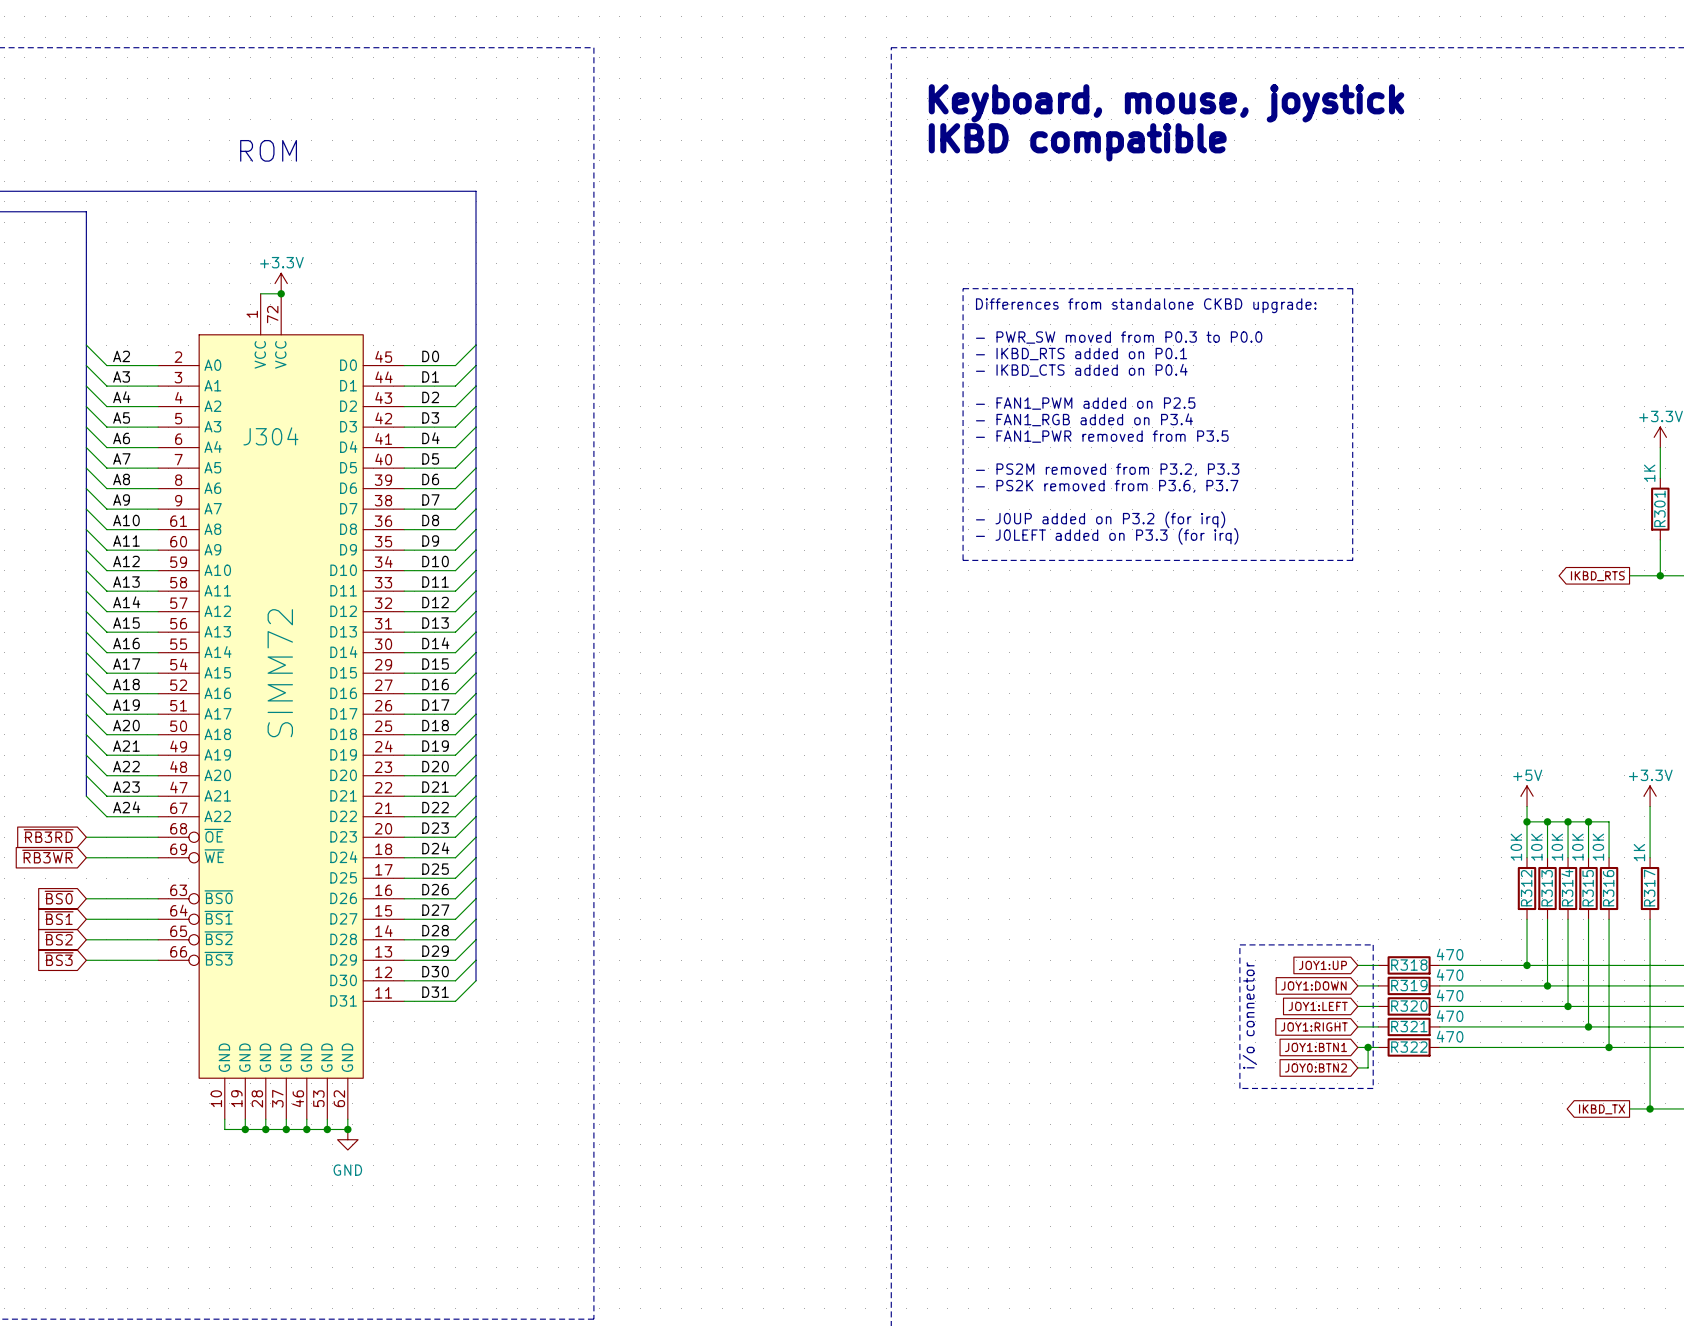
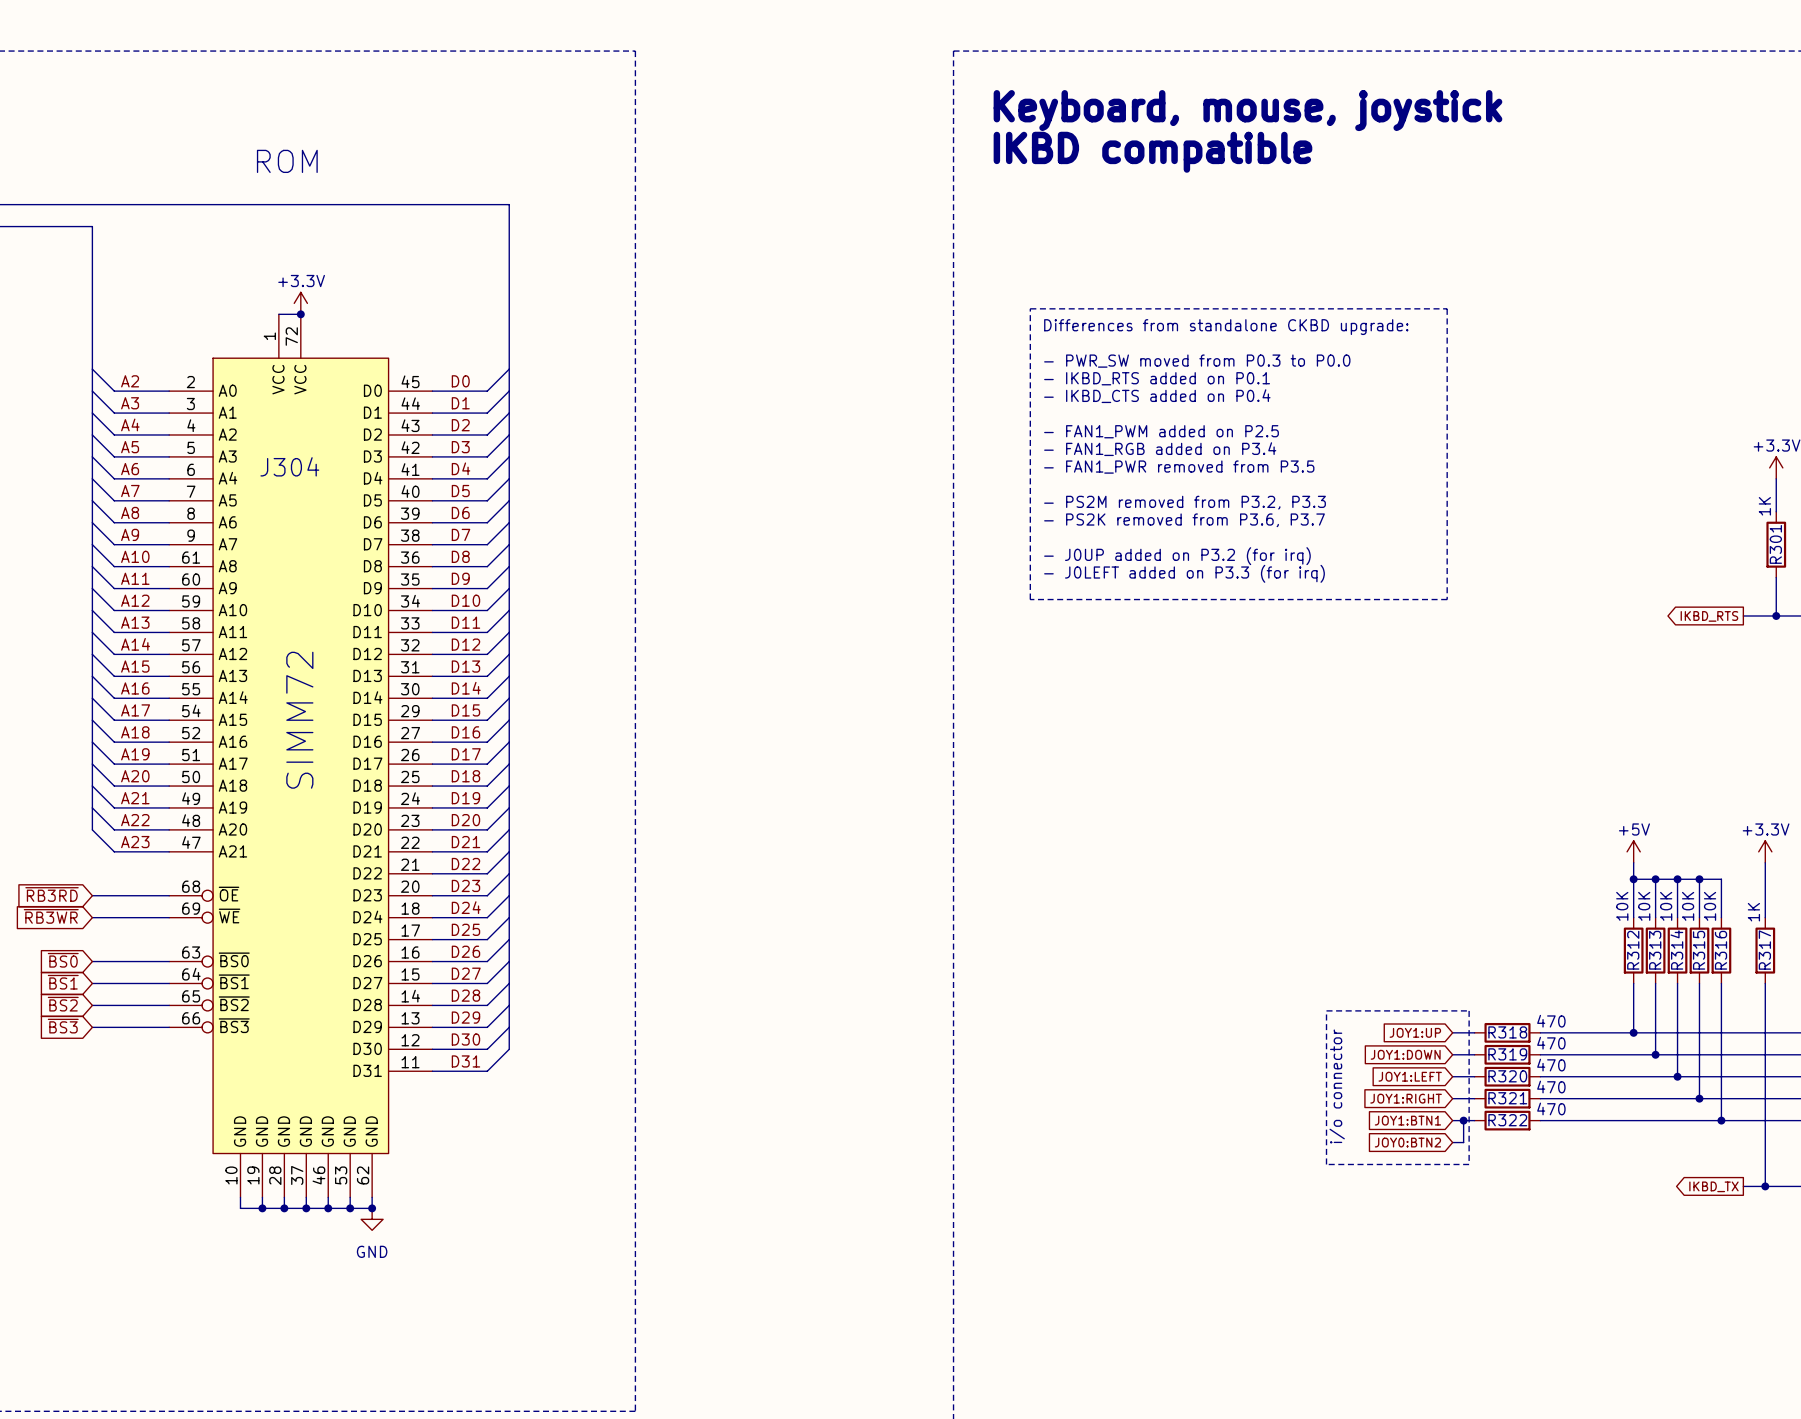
J304 symbol: [158, 293, 405, 1120] -> [169, 314, 433, 1198]
bus: (86, 775) (86, 796) -> none
wire: (86, 796) (106, 816) (158, 816) -> none
label: A24 (126, 807) -> none

